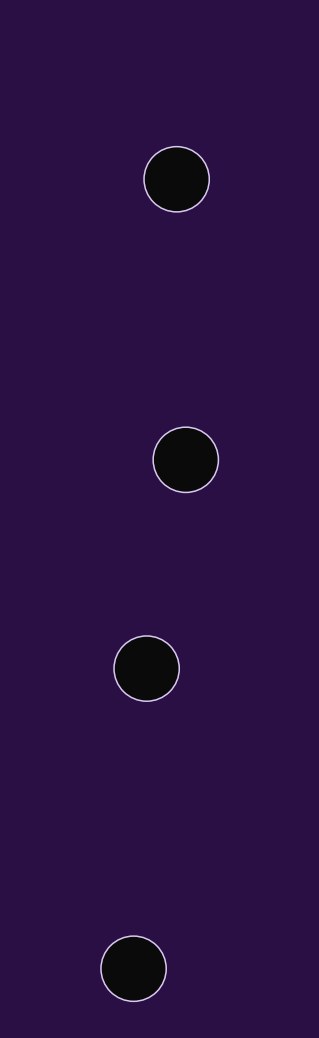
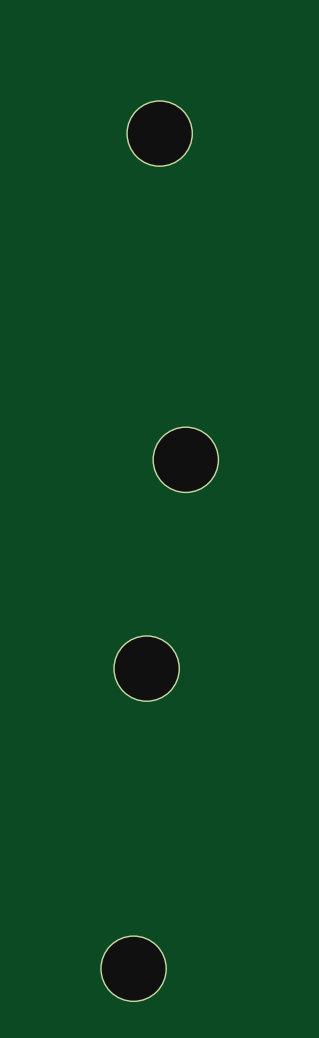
part position: (176, 179) -> (159, 133)

